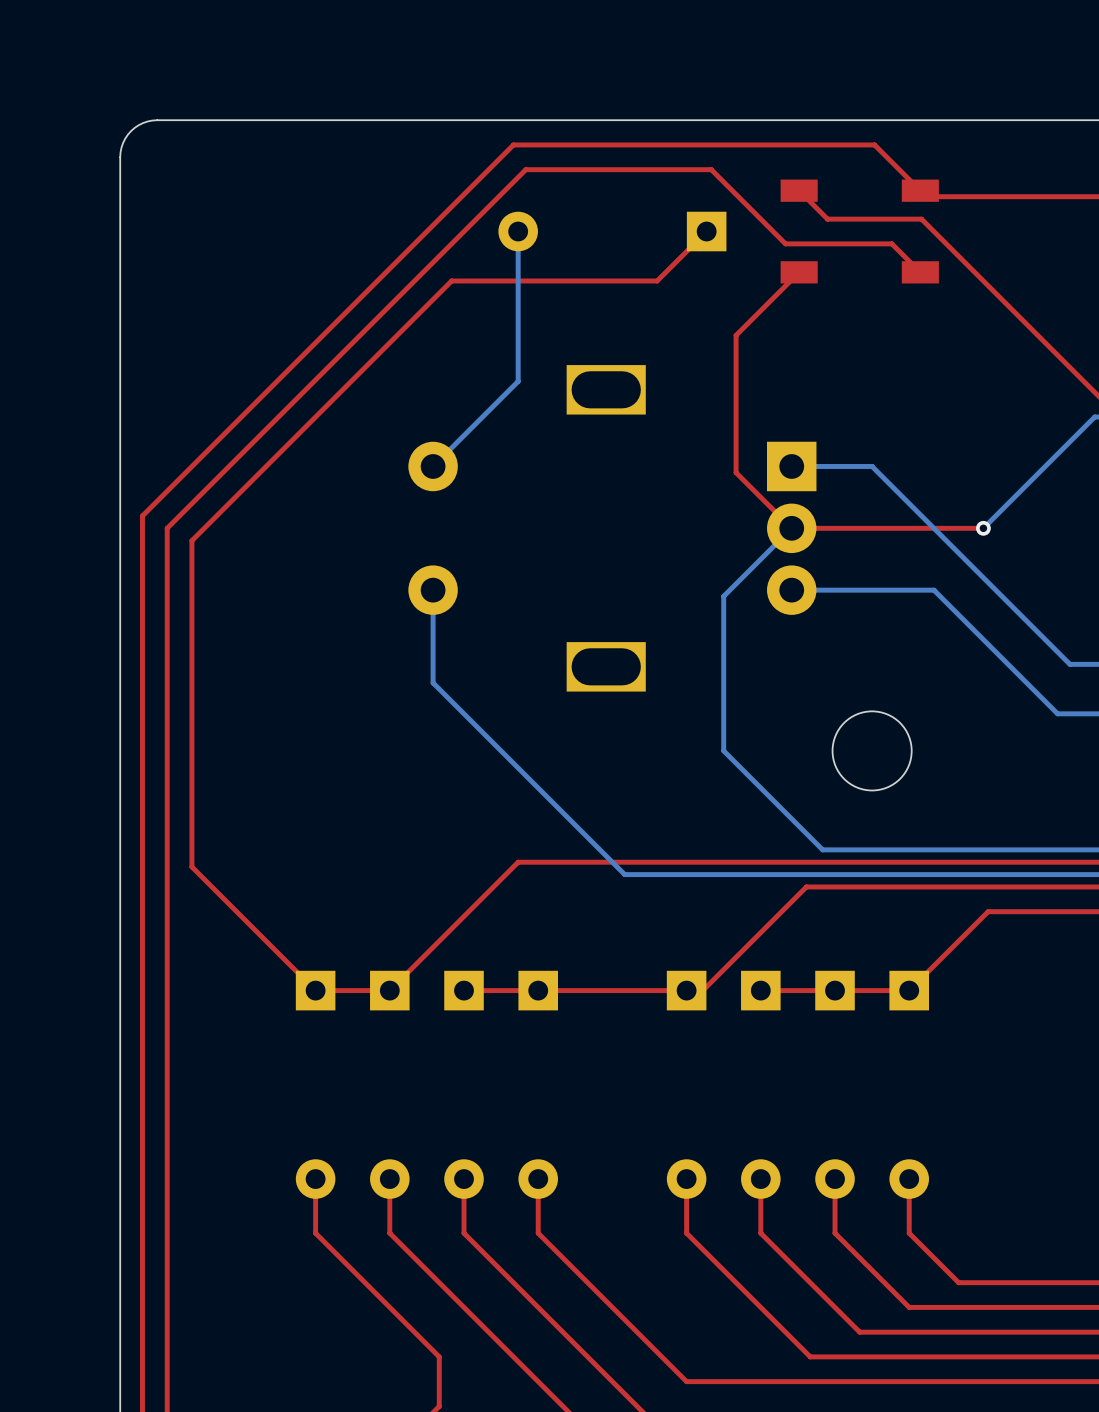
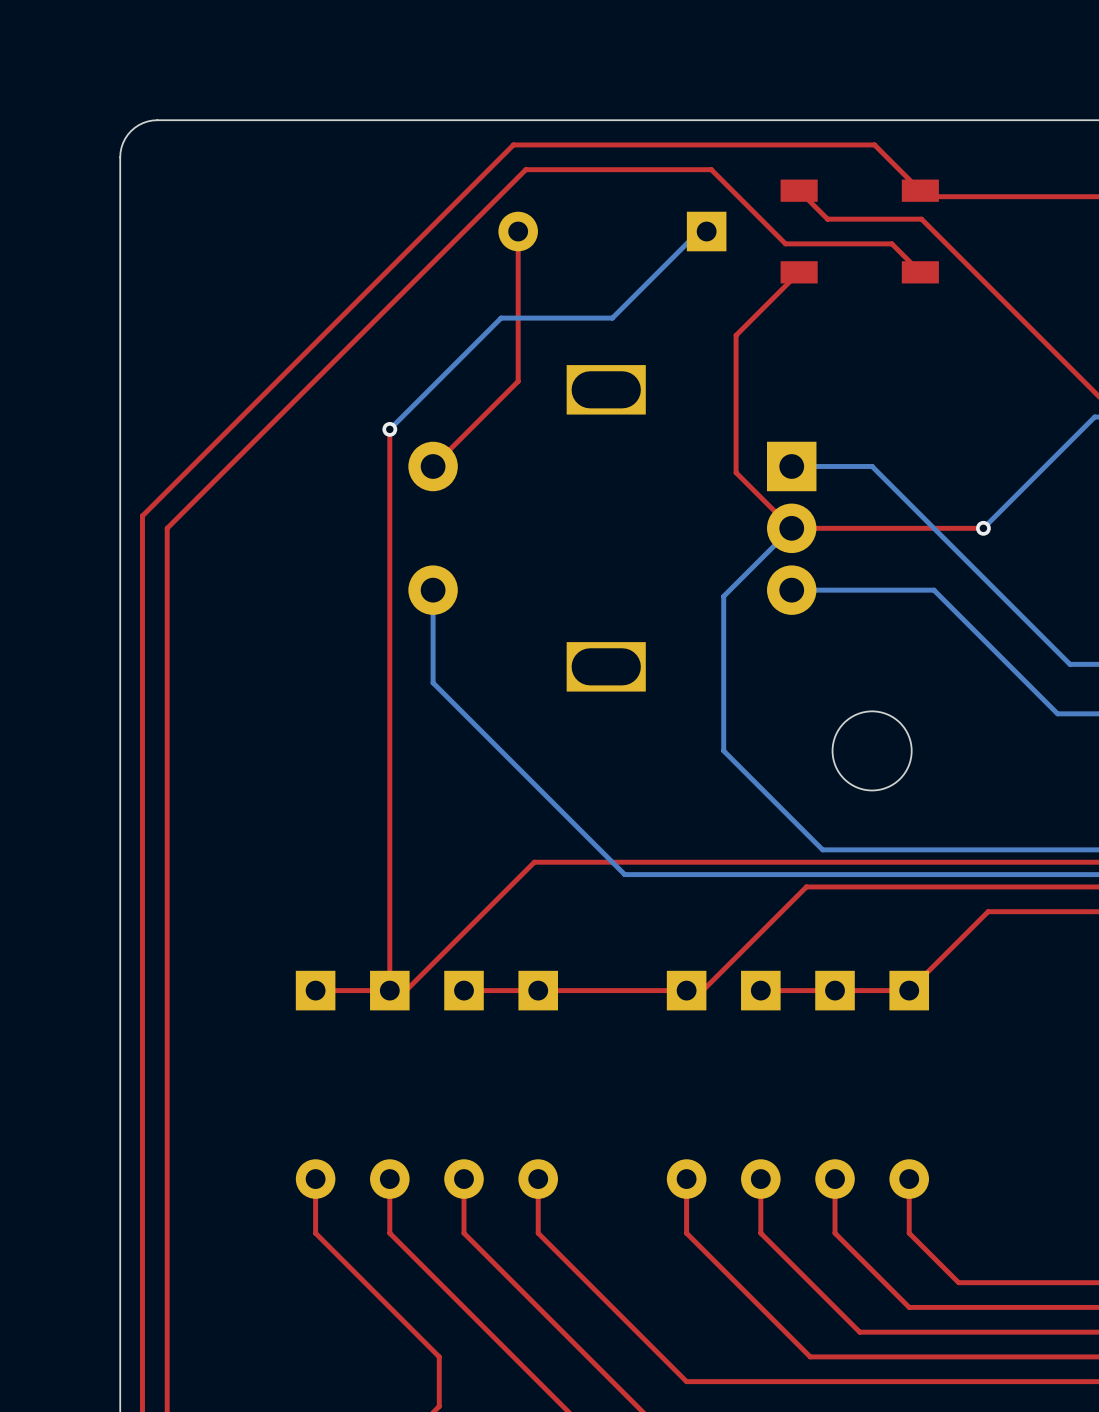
top track: none -> (518, 231) (518, 381) (433, 466)
bottom track: (518, 231) (518, 381) (433, 466) -> none
bottom track: none -> (698, 231) (612, 318) (501, 318) (389, 429)
top track: (706, 231) (657, 280) (451, 280) (191, 540) (191, 866) (315, 990) -> none
via: none -> (389, 429)
top track: (534, 862) (518, 862) (389, 990) -> (534, 862) (406, 990) (389, 990) (389, 429)

